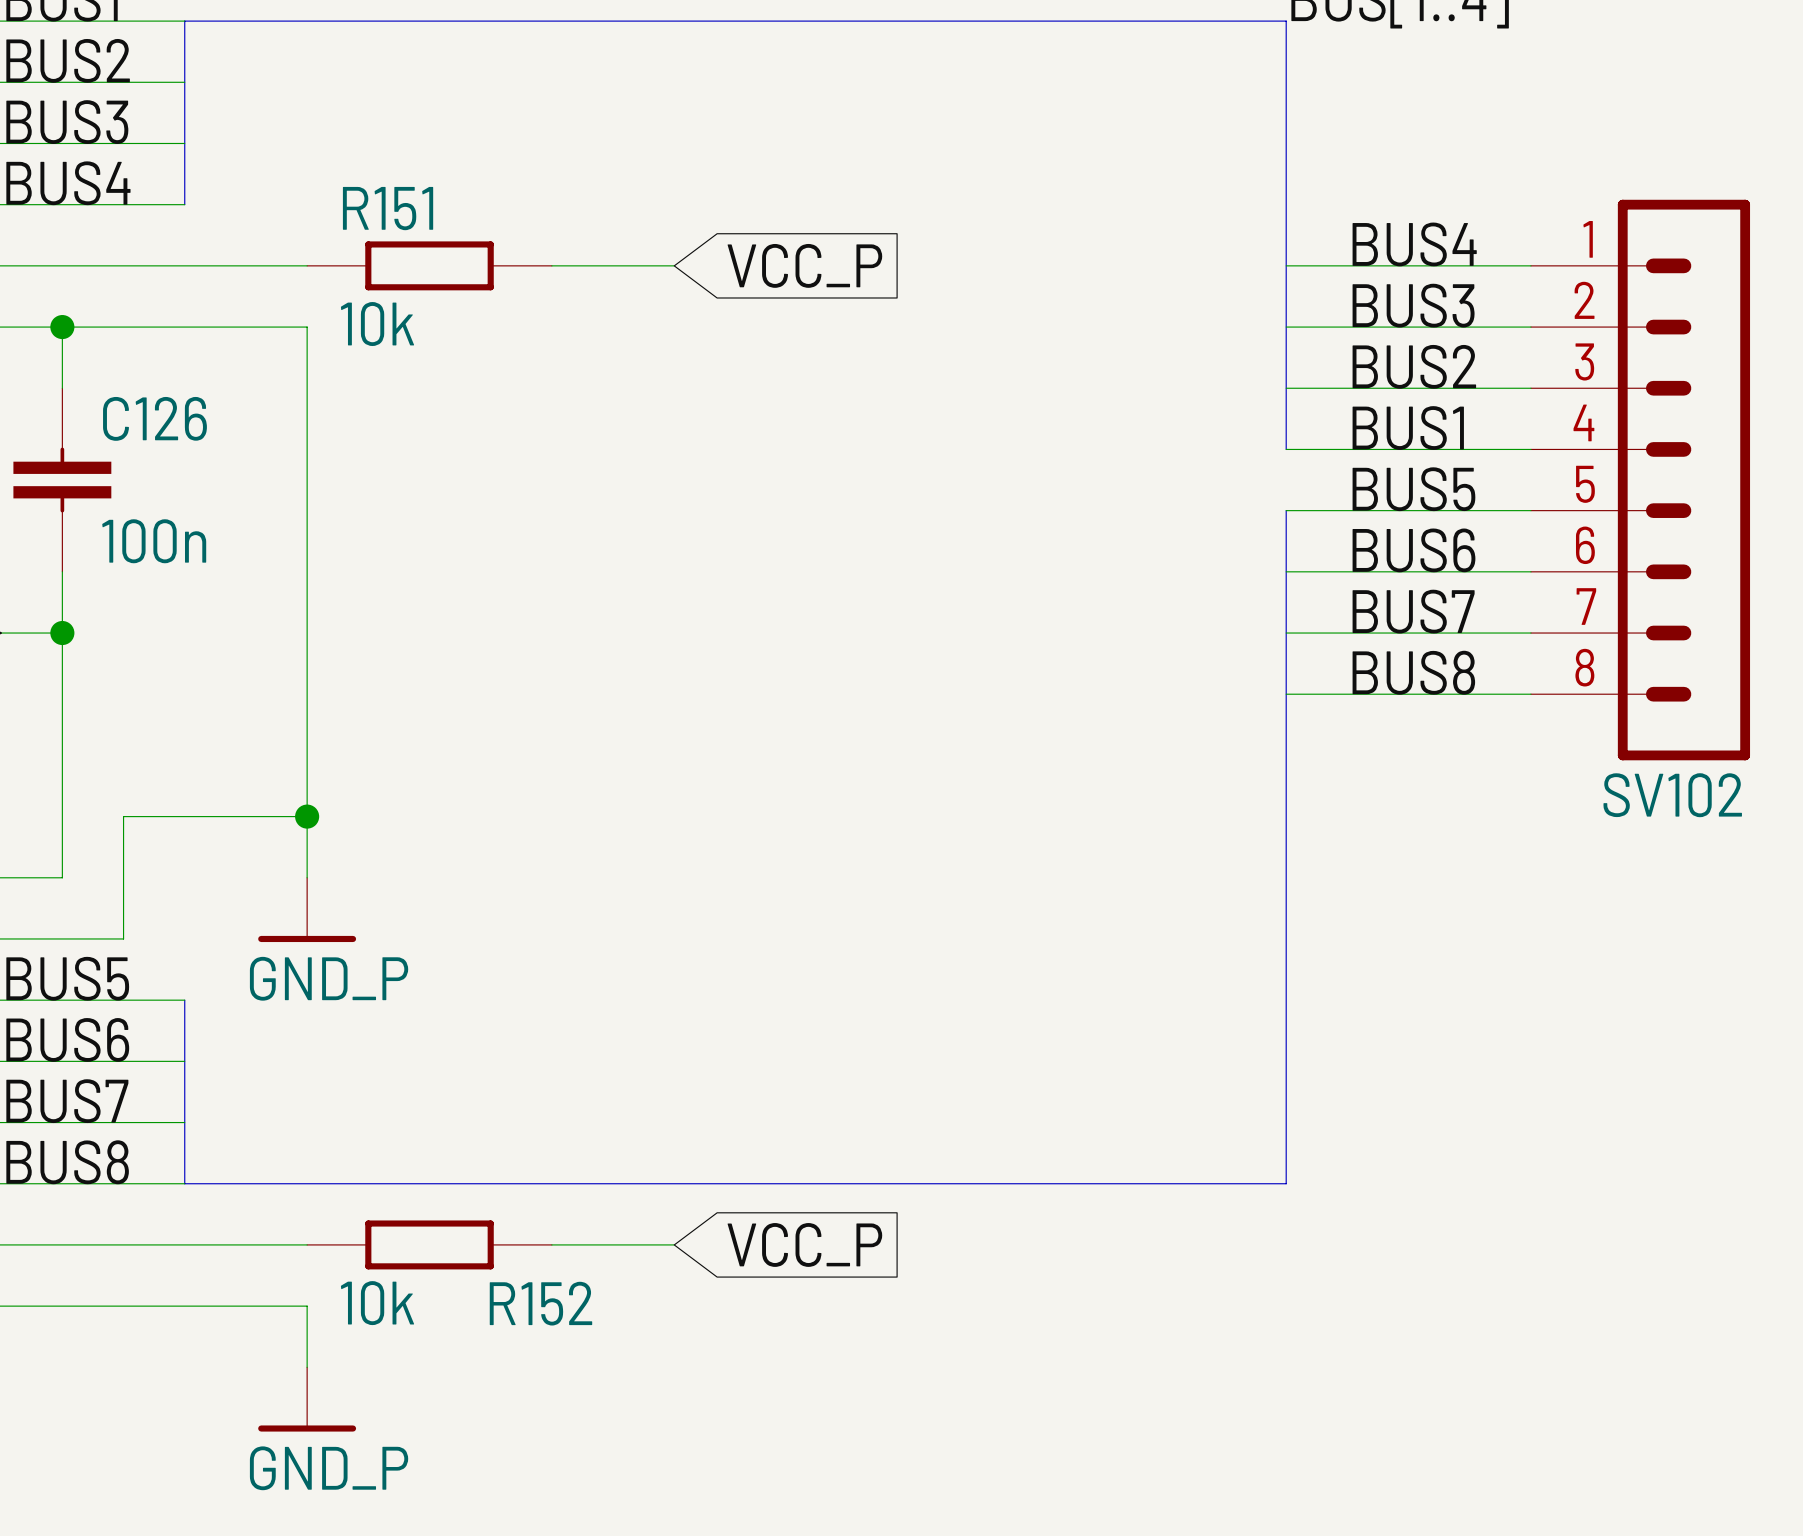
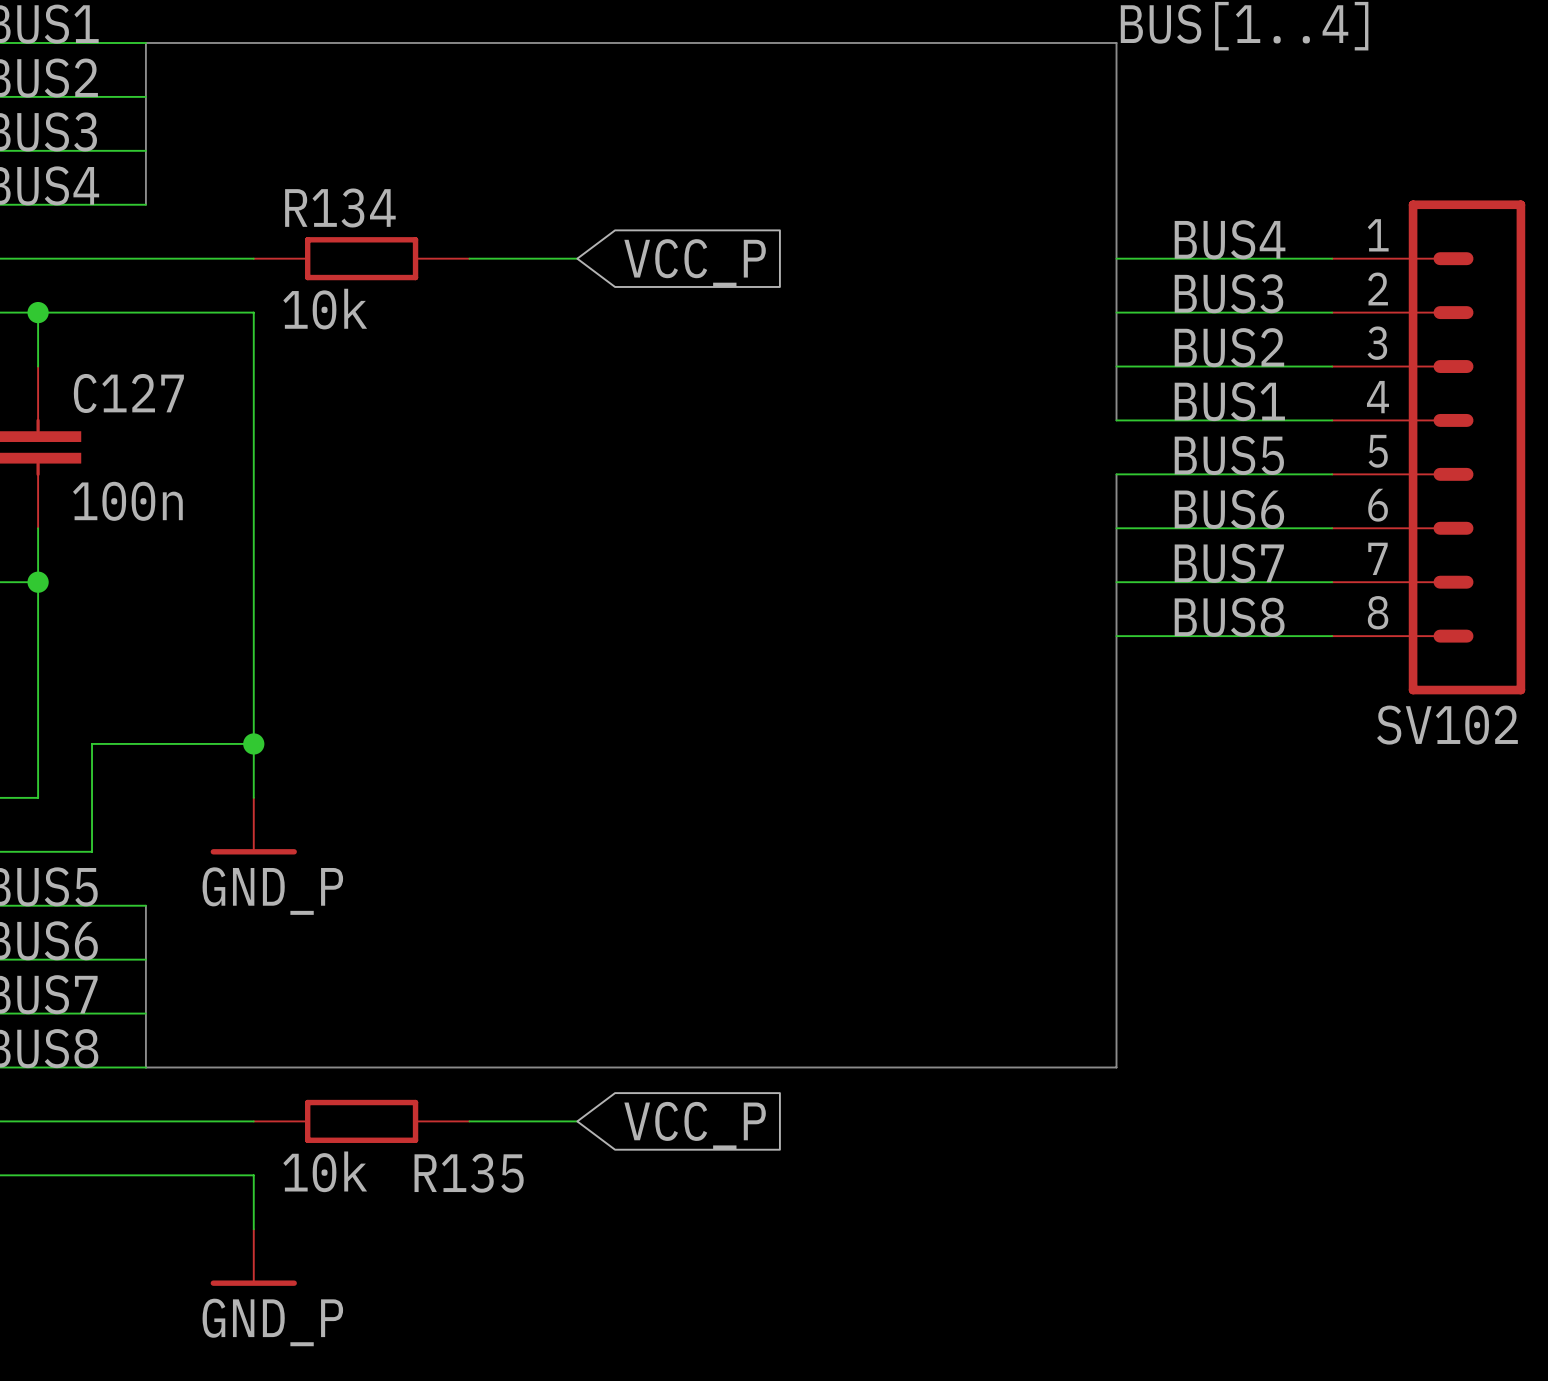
R151 name: R151 (388, 208) -> R134 (340, 207)
C126 name: C126 (154, 418) -> C127 (128, 393)
R152 name: R152 (540, 1303) -> R135 (469, 1173)

